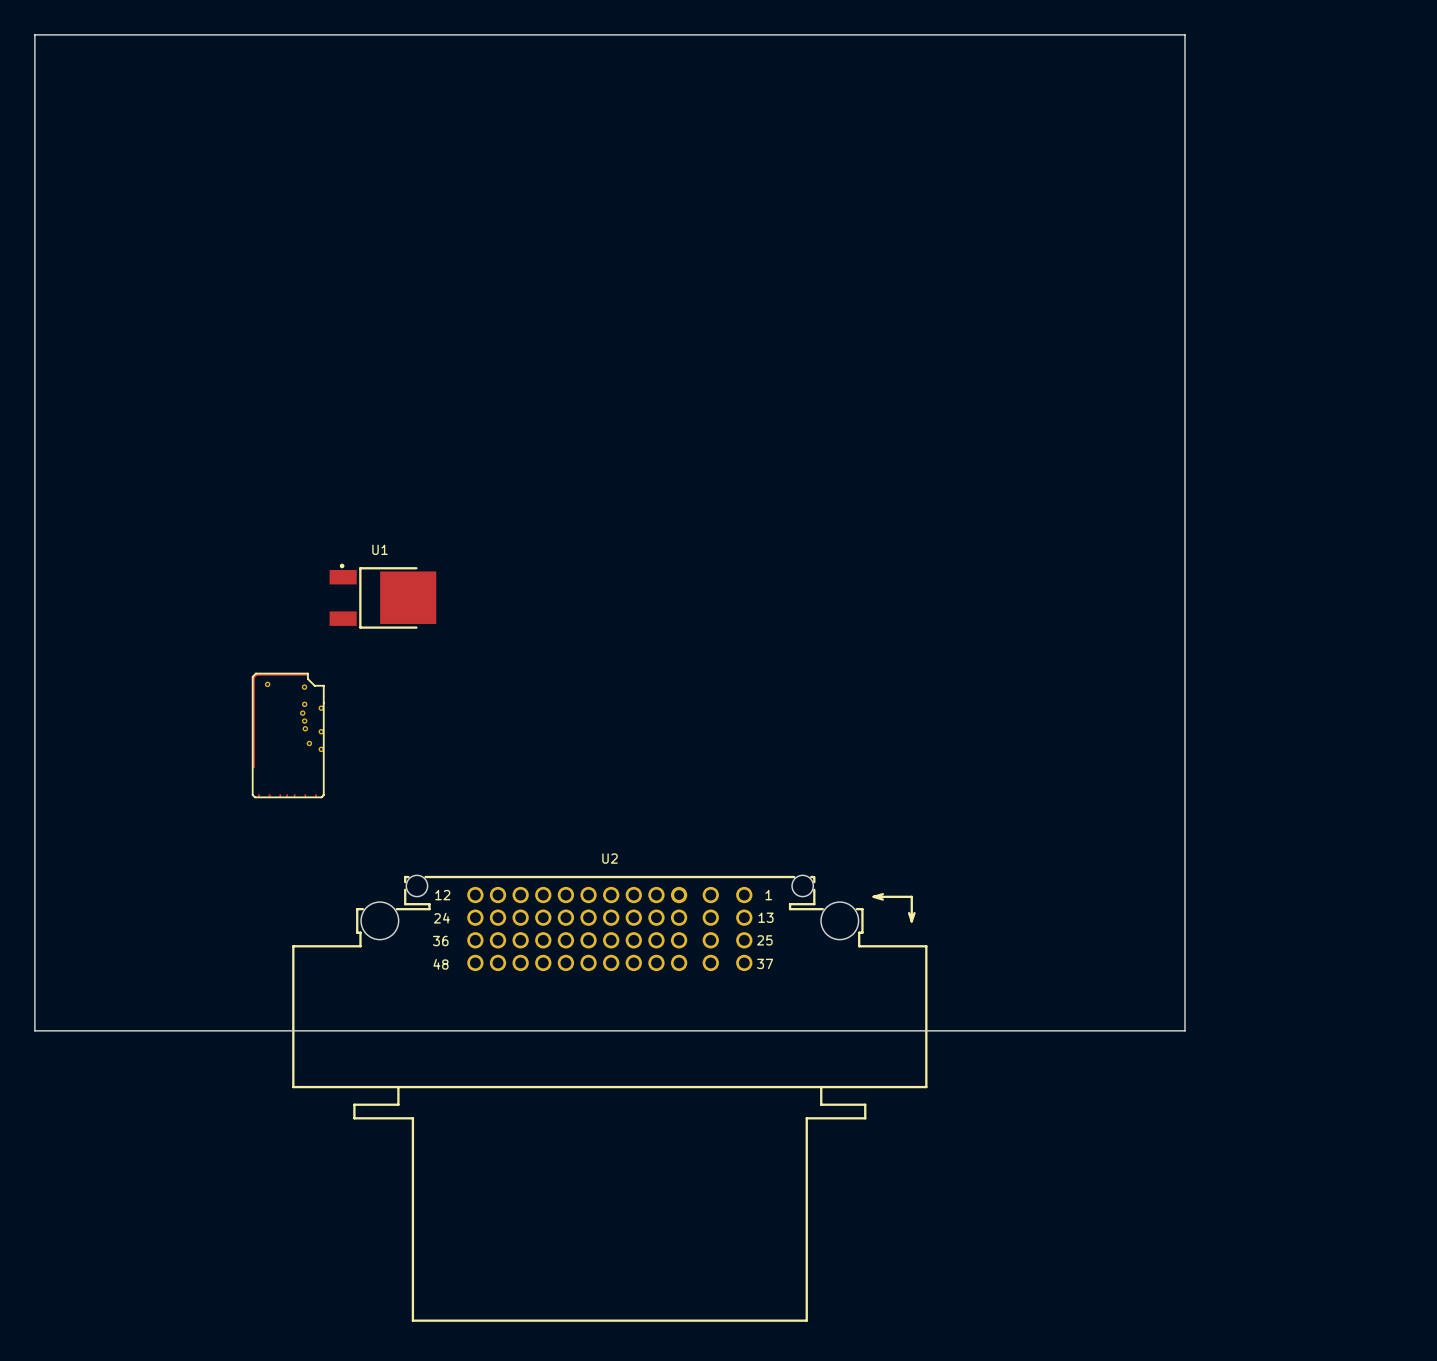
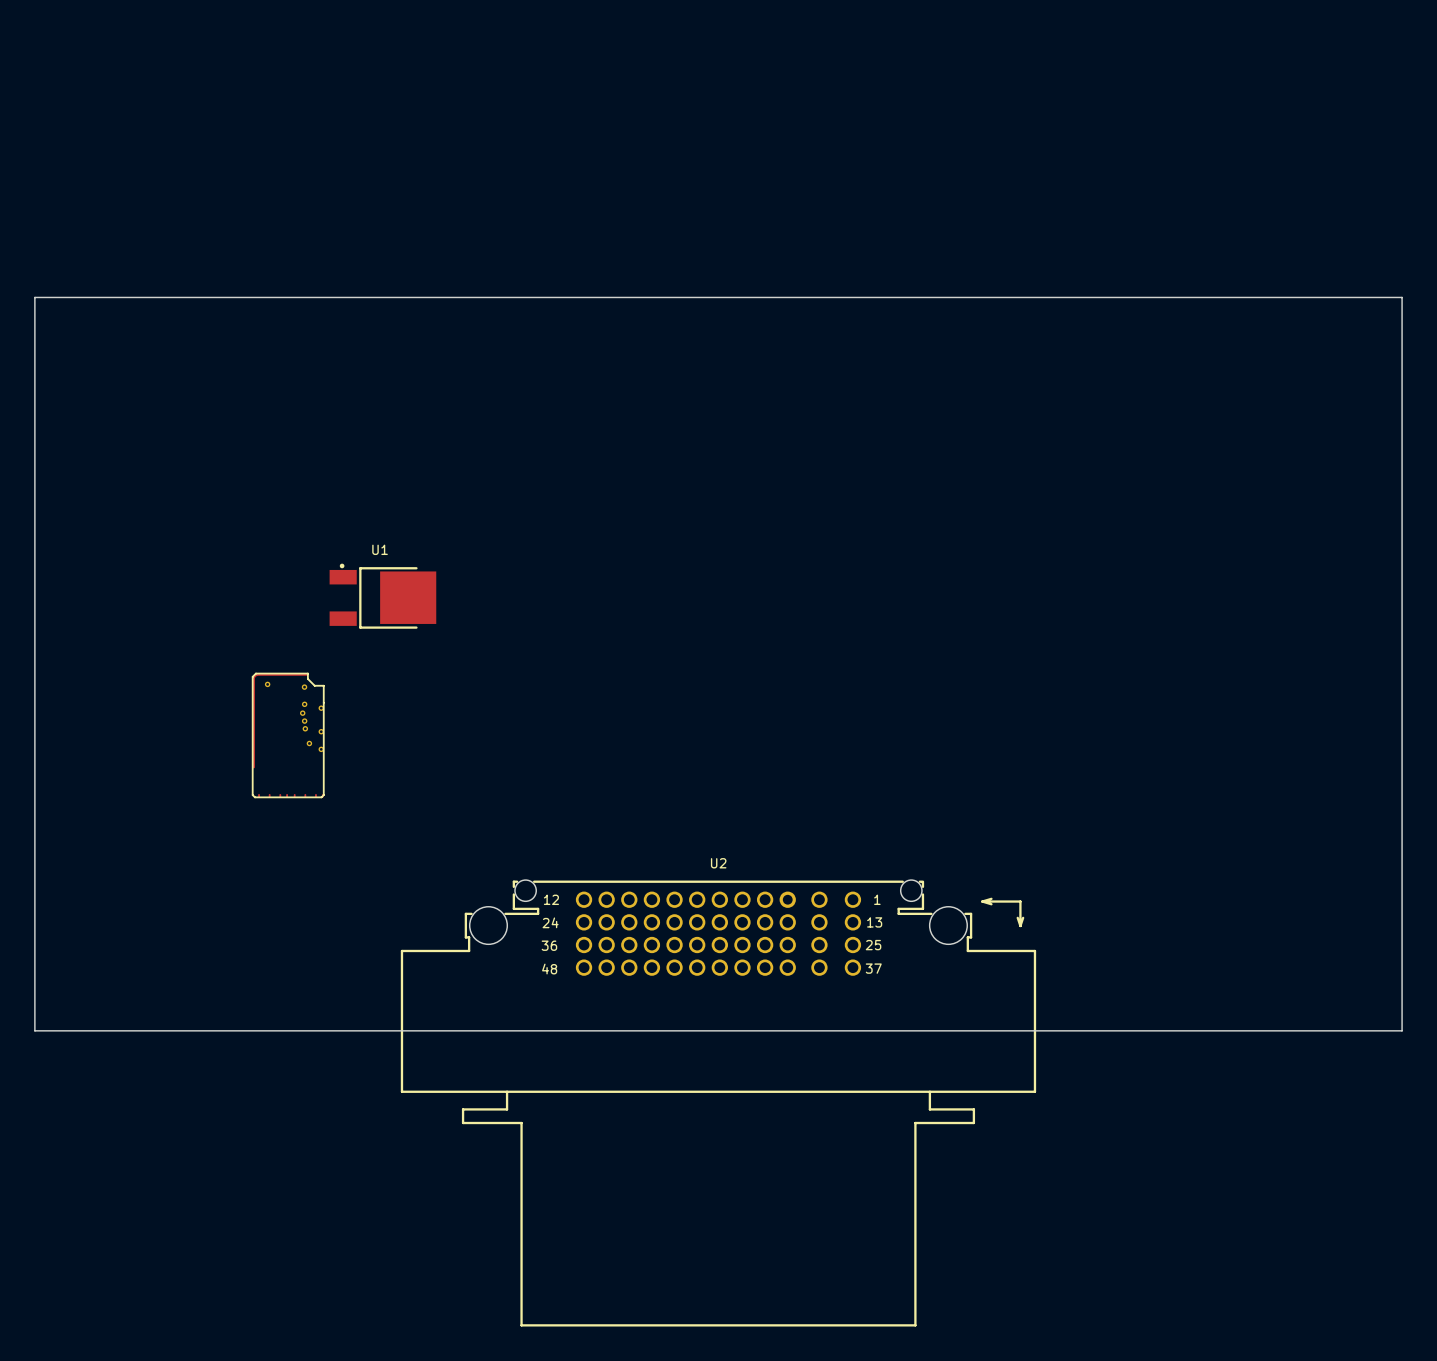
board edge: (34, 297) (34, 34) (1184, 34) (1184, 1030) -> (34, 297) (1402, 297) (1402, 1030) (1184, 1030)
U2 position: (609, 1098) -> (718, 1103)

